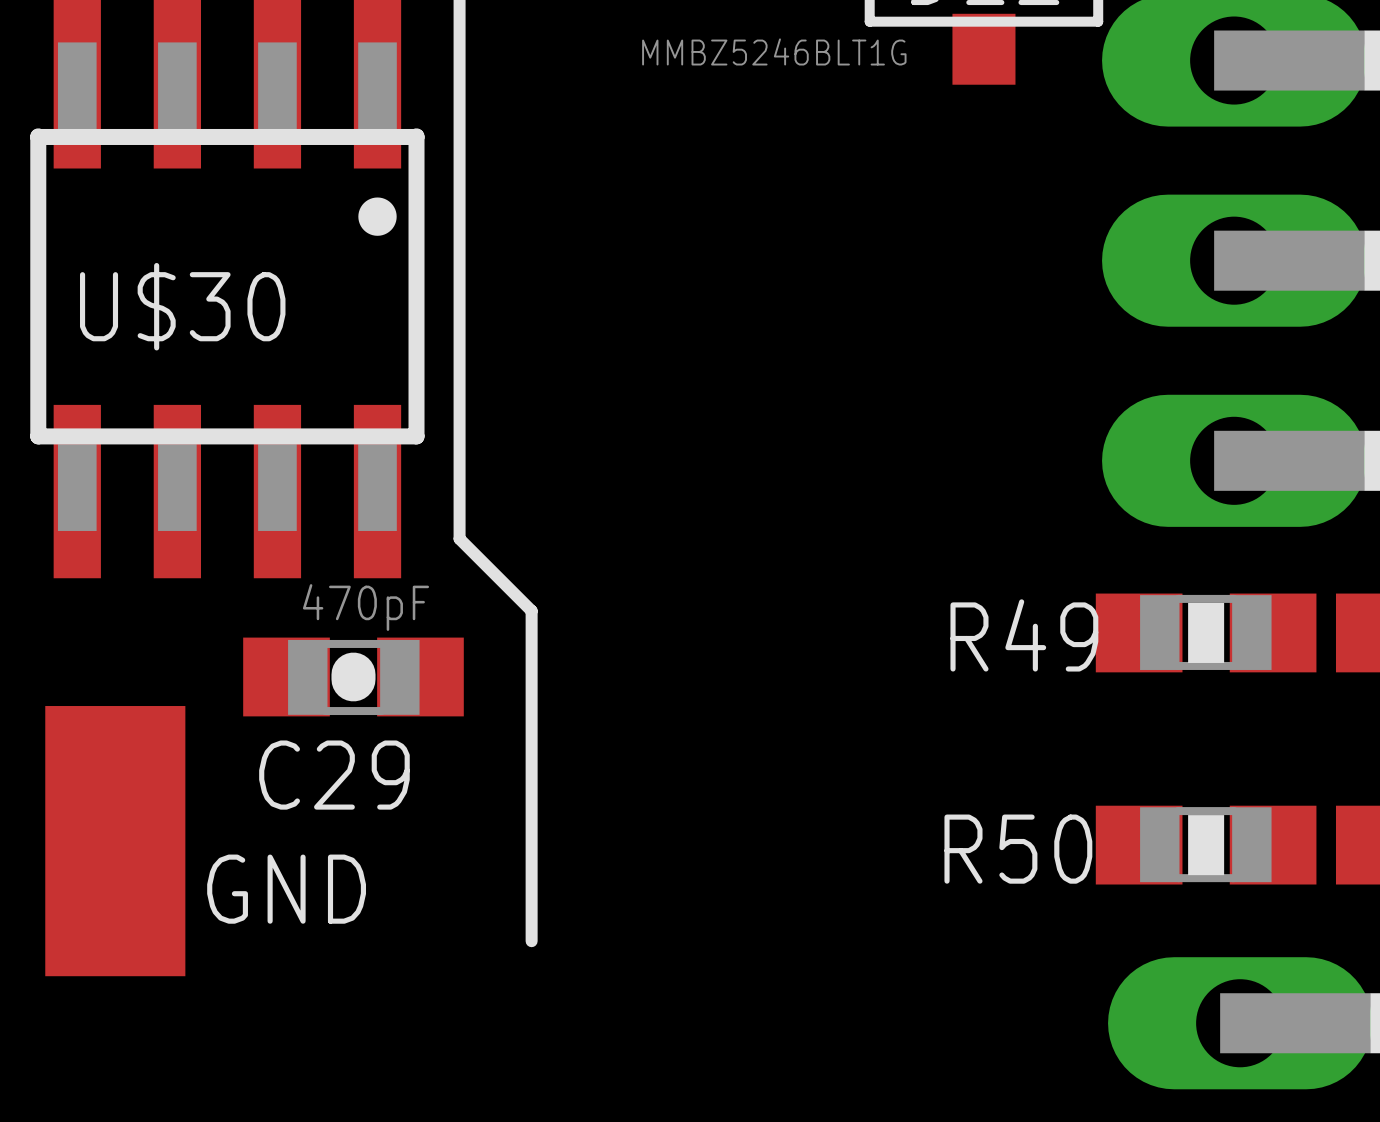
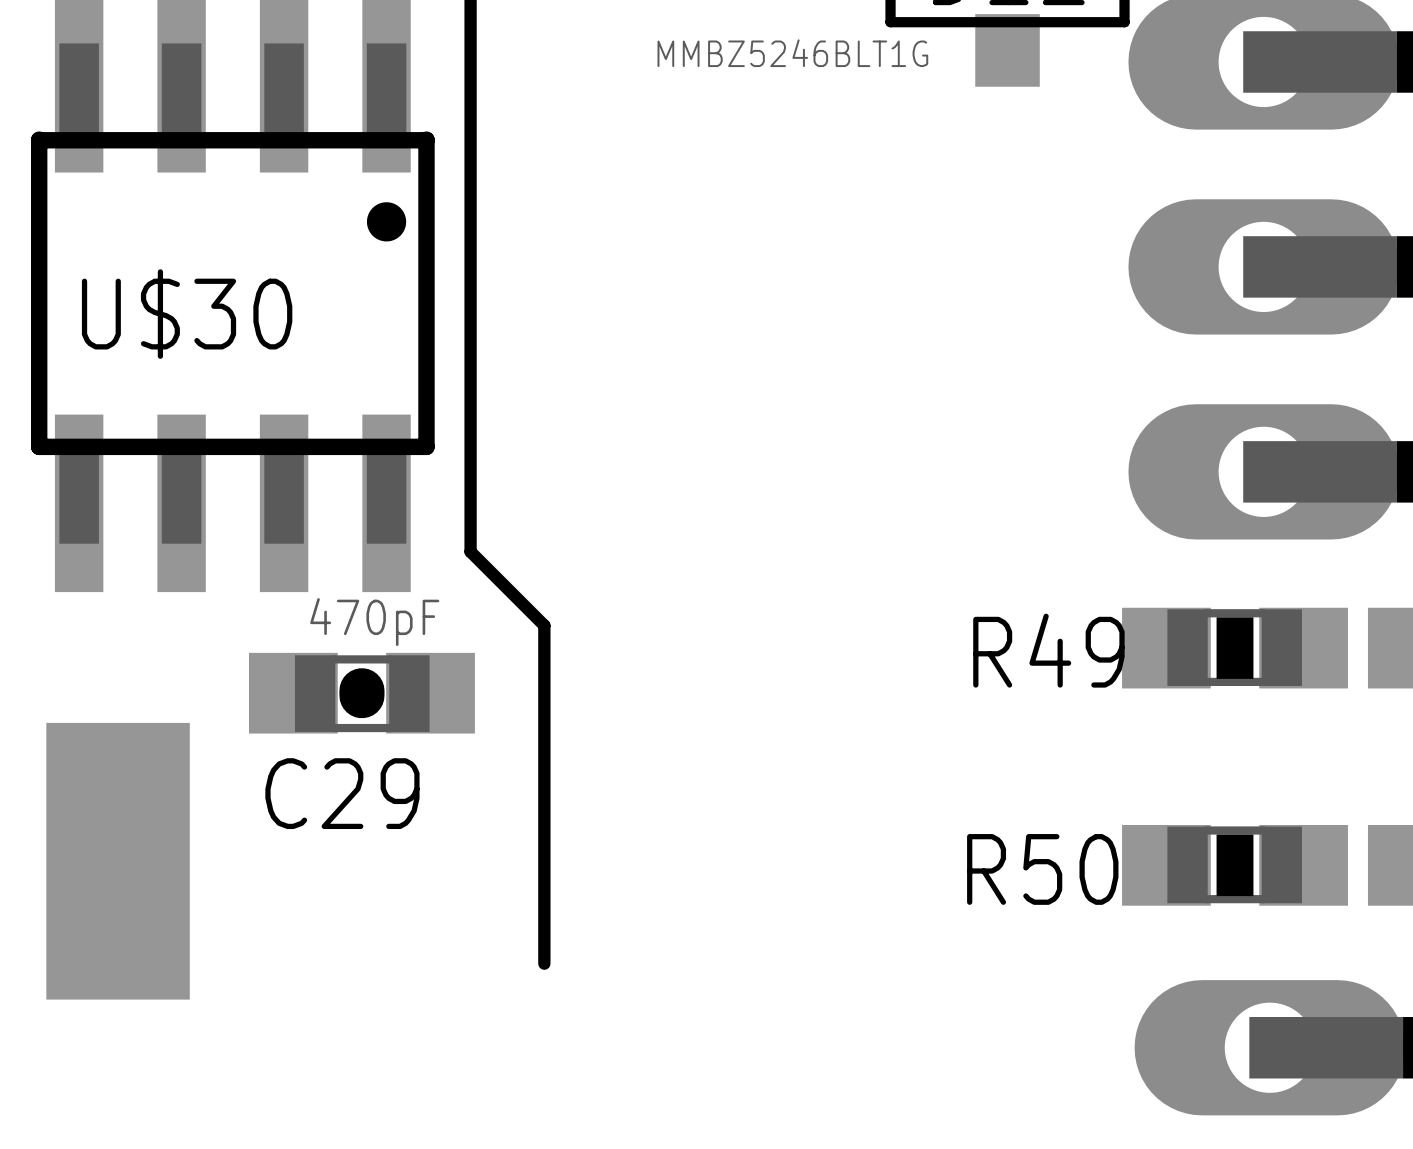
text: GND (286, 889) -> none

